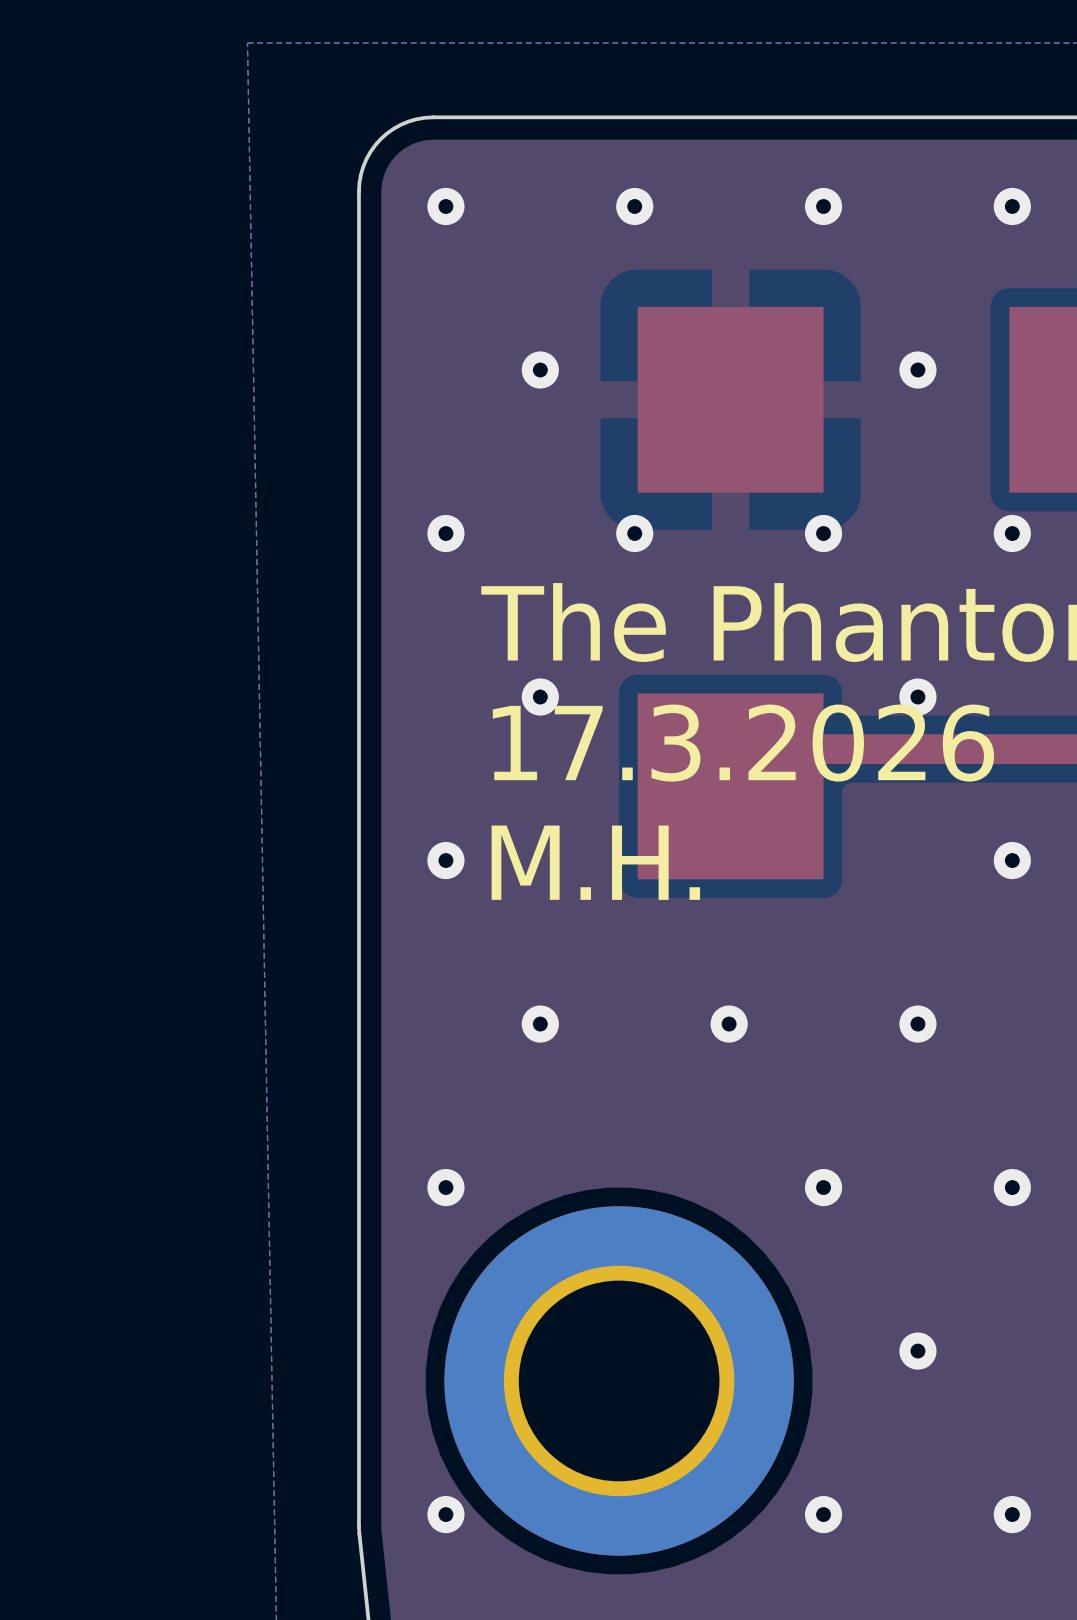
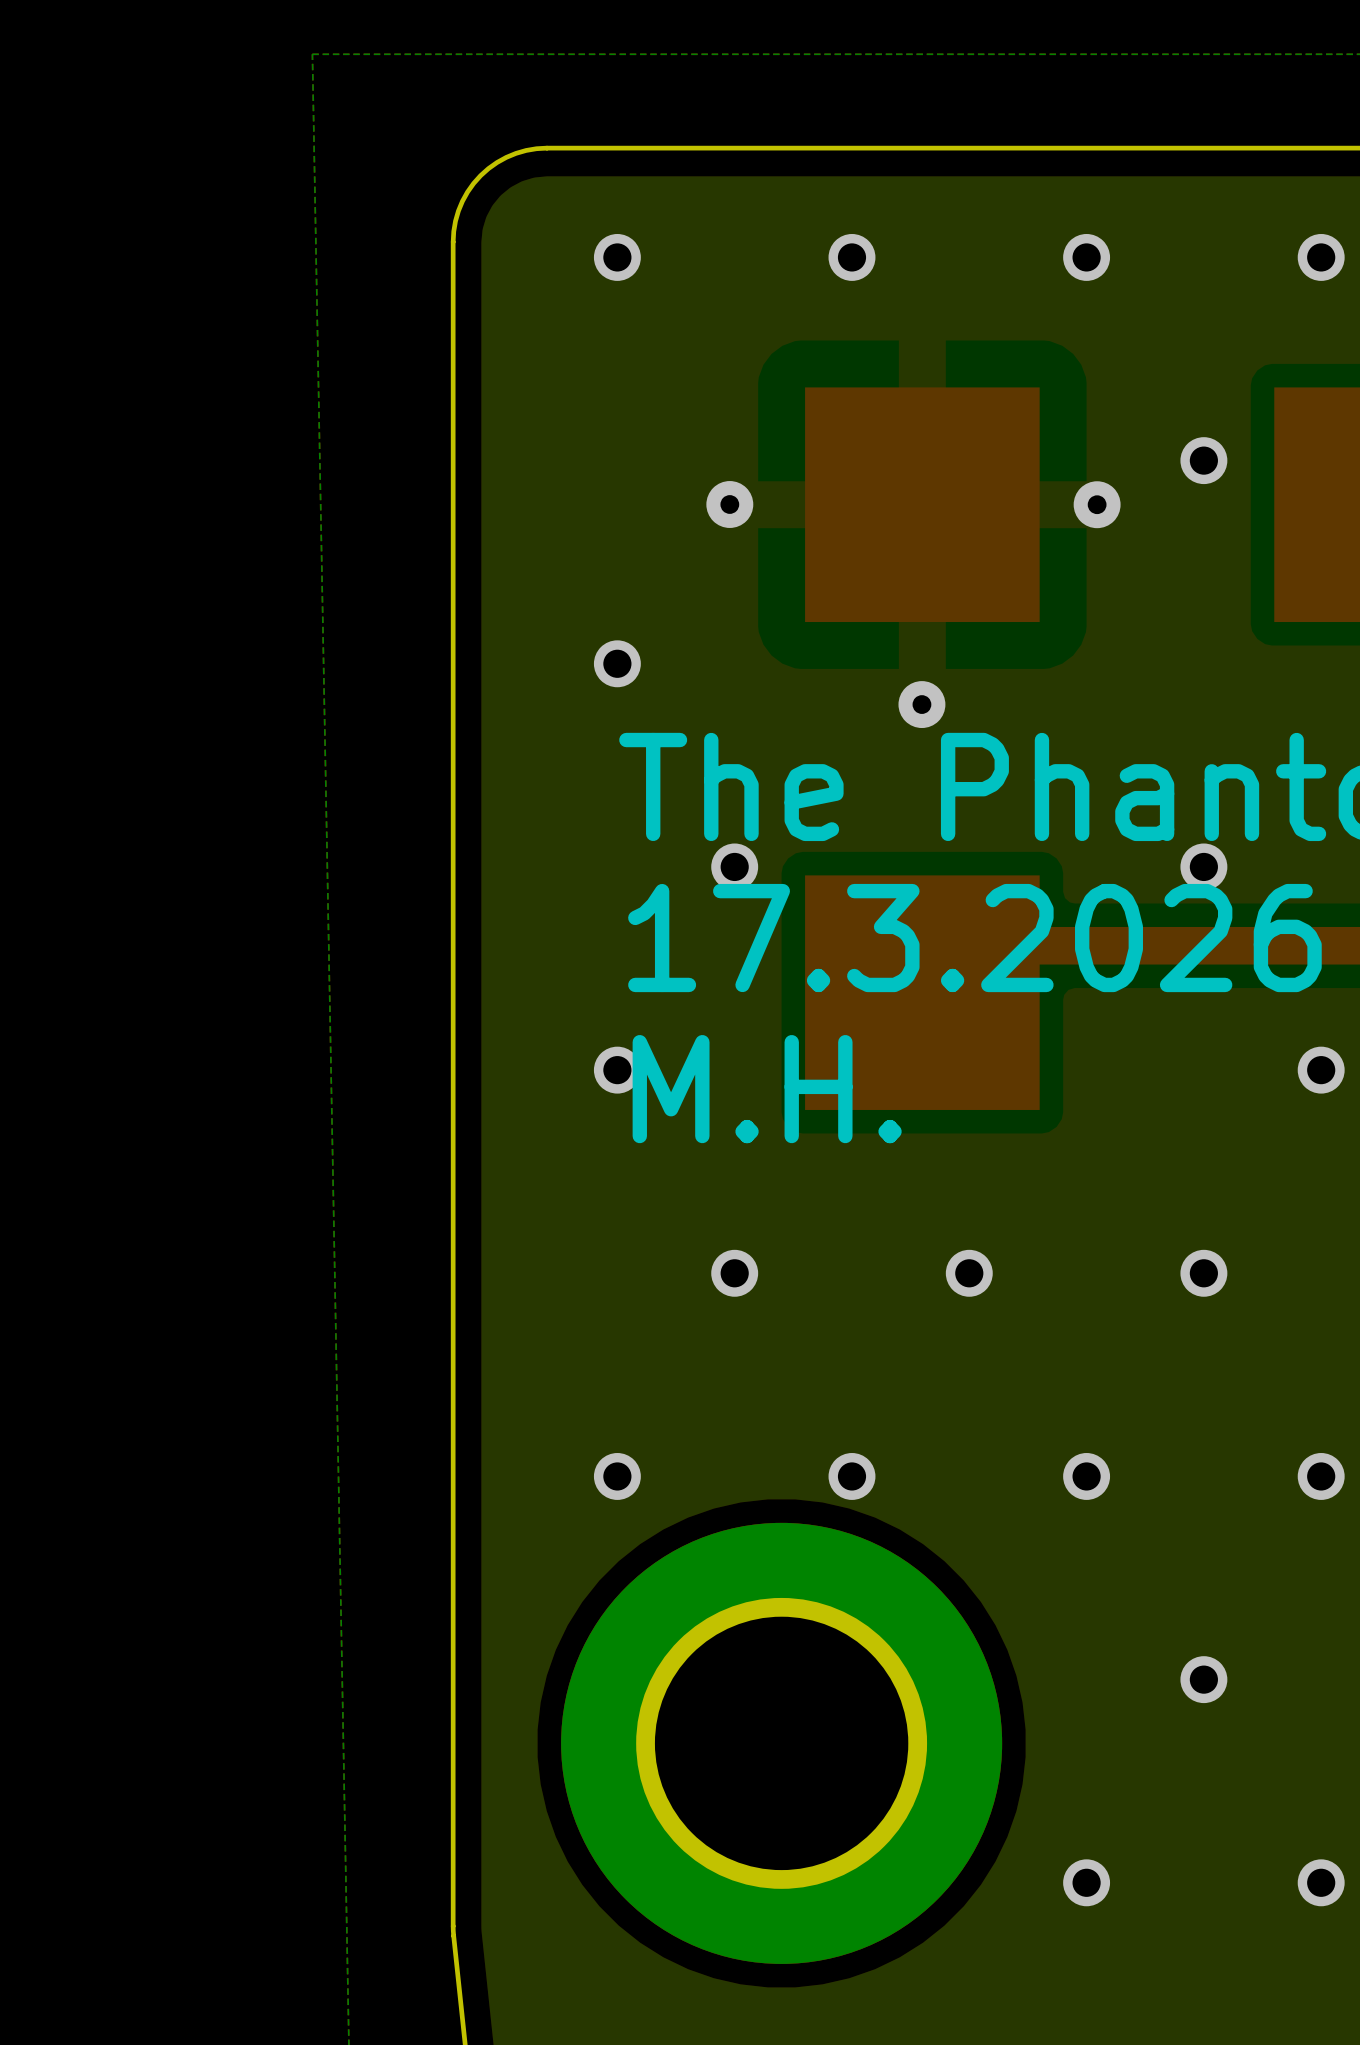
via: none -> (617, 257)
via: none -> (851, 257)
via: (445, 206) -> none
via: (634, 206) -> none
via position: (823, 206) -> (1086, 257)
via position: (1012, 206) -> (1321, 257)
via: none -> (1203, 460)
via position: (540, 370) -> (729, 504)
via position: (917, 370) -> (1097, 504)
via: none -> (617, 663)
via: (445, 533) -> none
via: (634, 533) -> none
via: (823, 533) -> none
via: (1012, 533) -> none
via: none -> (921, 704)
via: none -> (734, 866)
via: (540, 697) -> none
via position: (917, 697) -> (1203, 866)
via: none -> (617, 1070)
via: (445, 860) -> none
via position: (1012, 860) -> (1321, 1070)
via: none -> (734, 1273)
via: none -> (969, 1273)
via: (540, 1024) -> none
via: (729, 1024) -> none
via position: (917, 1024) -> (1203, 1273)
via: none -> (617, 1476)
via: none -> (851, 1476)
via: (445, 1187) -> none
via position: (823, 1187) -> (1086, 1476)
via position: (1012, 1187) -> (1321, 1476)
via position: (917, 1351) -> (1203, 1679)
via: (445, 1514) -> none
via position: (823, 1514) -> (1086, 1882)
via position: (1012, 1514) -> (1321, 1882)

